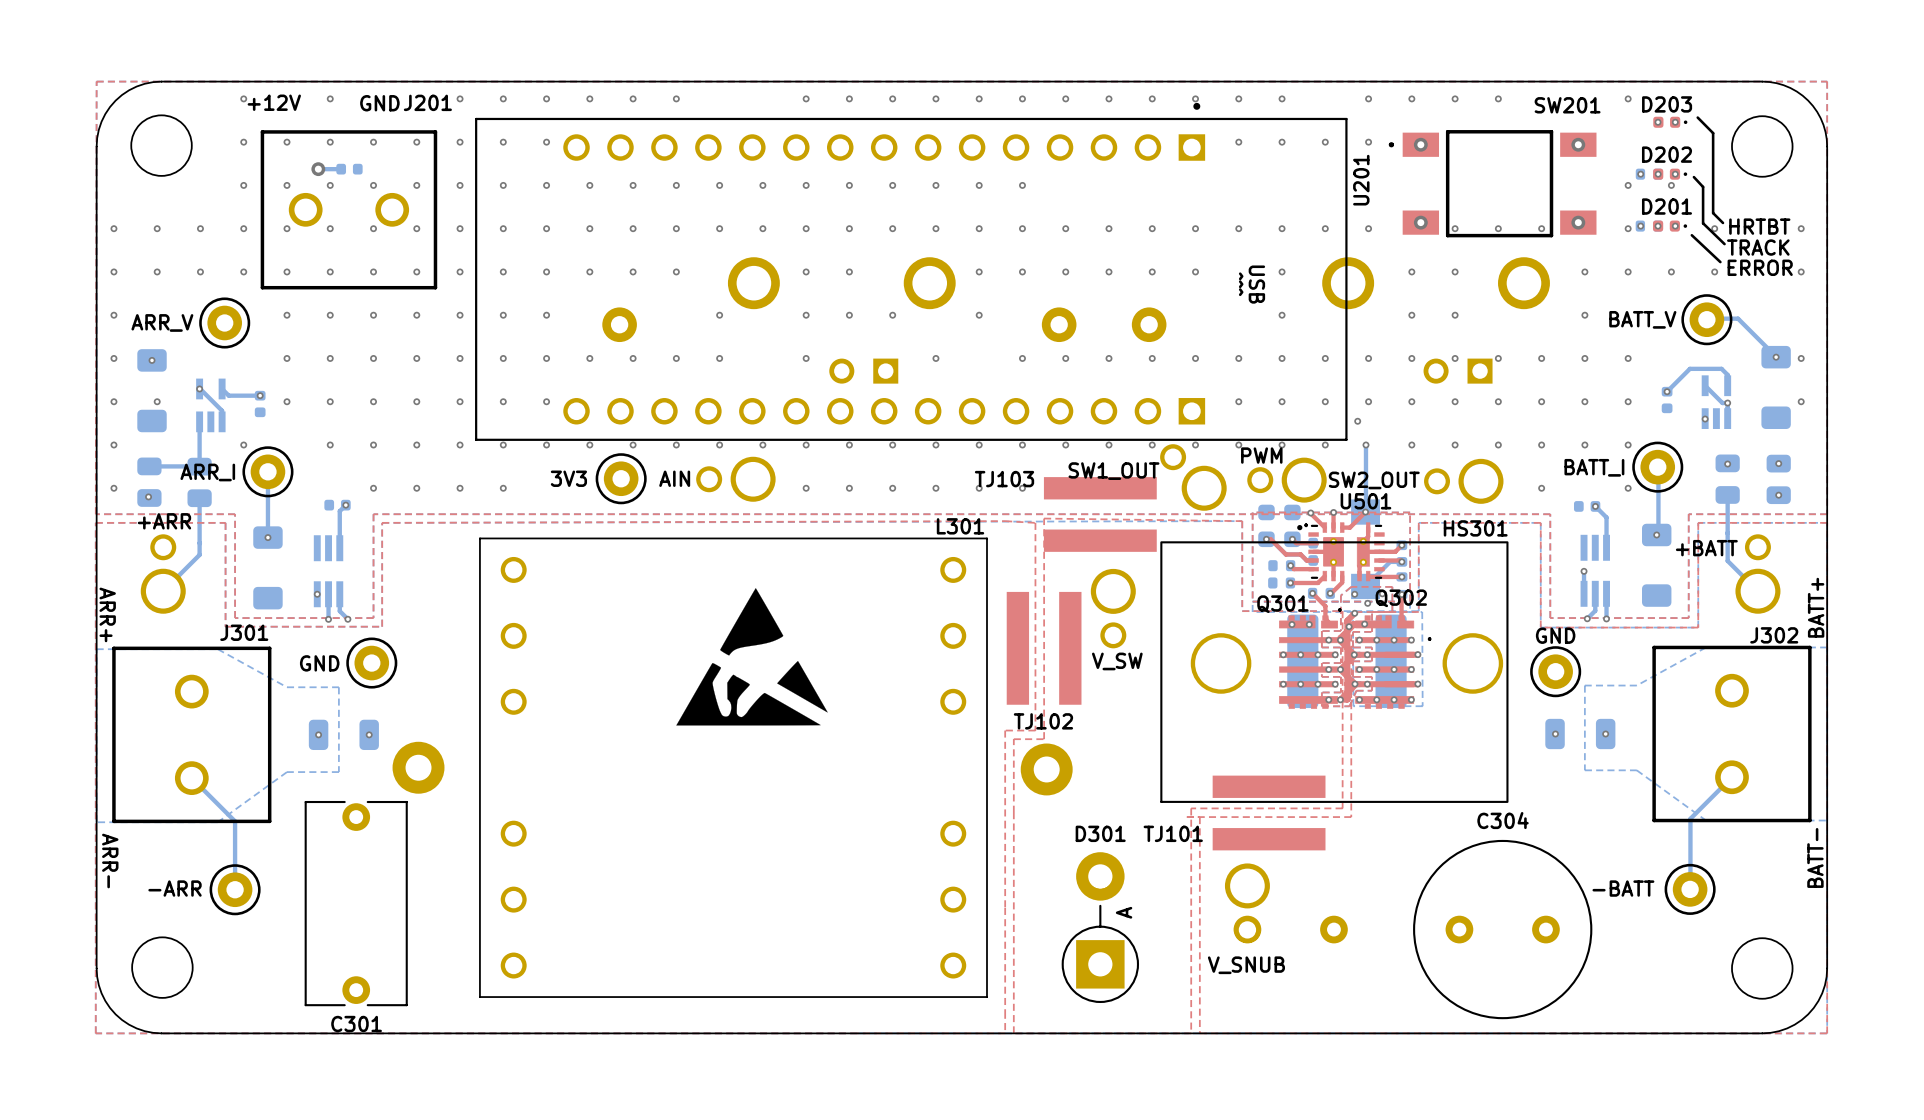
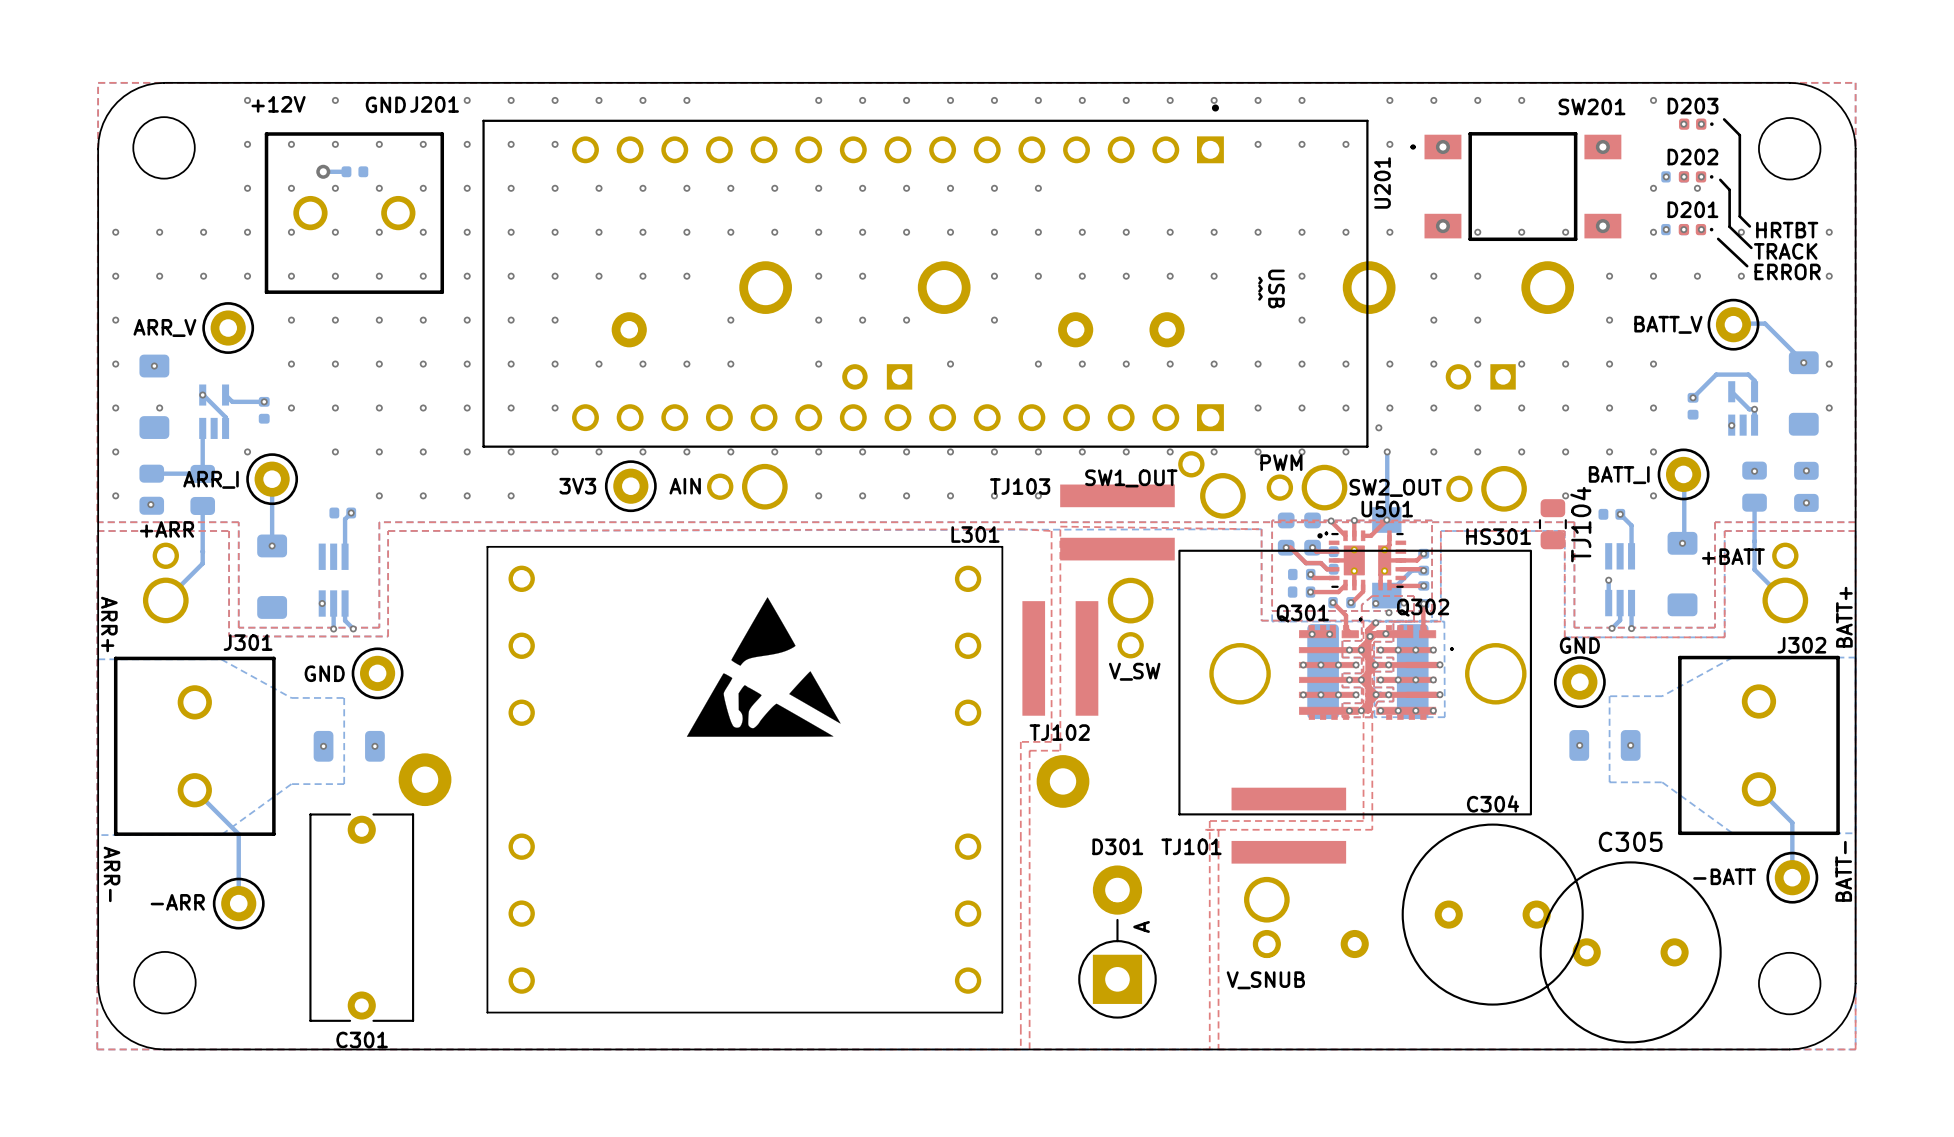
TJ104: none -> (1552, 524)
bottom track: (1731, 777) (1690, 818) (1690, 888) -> (1758, 789) (1792, 822) (1792, 877)
part position: (1690, 889) -> (1792, 877)
C304 position: (1502, 929) -> (1492, 914)
C305: none -> (1630, 952)

